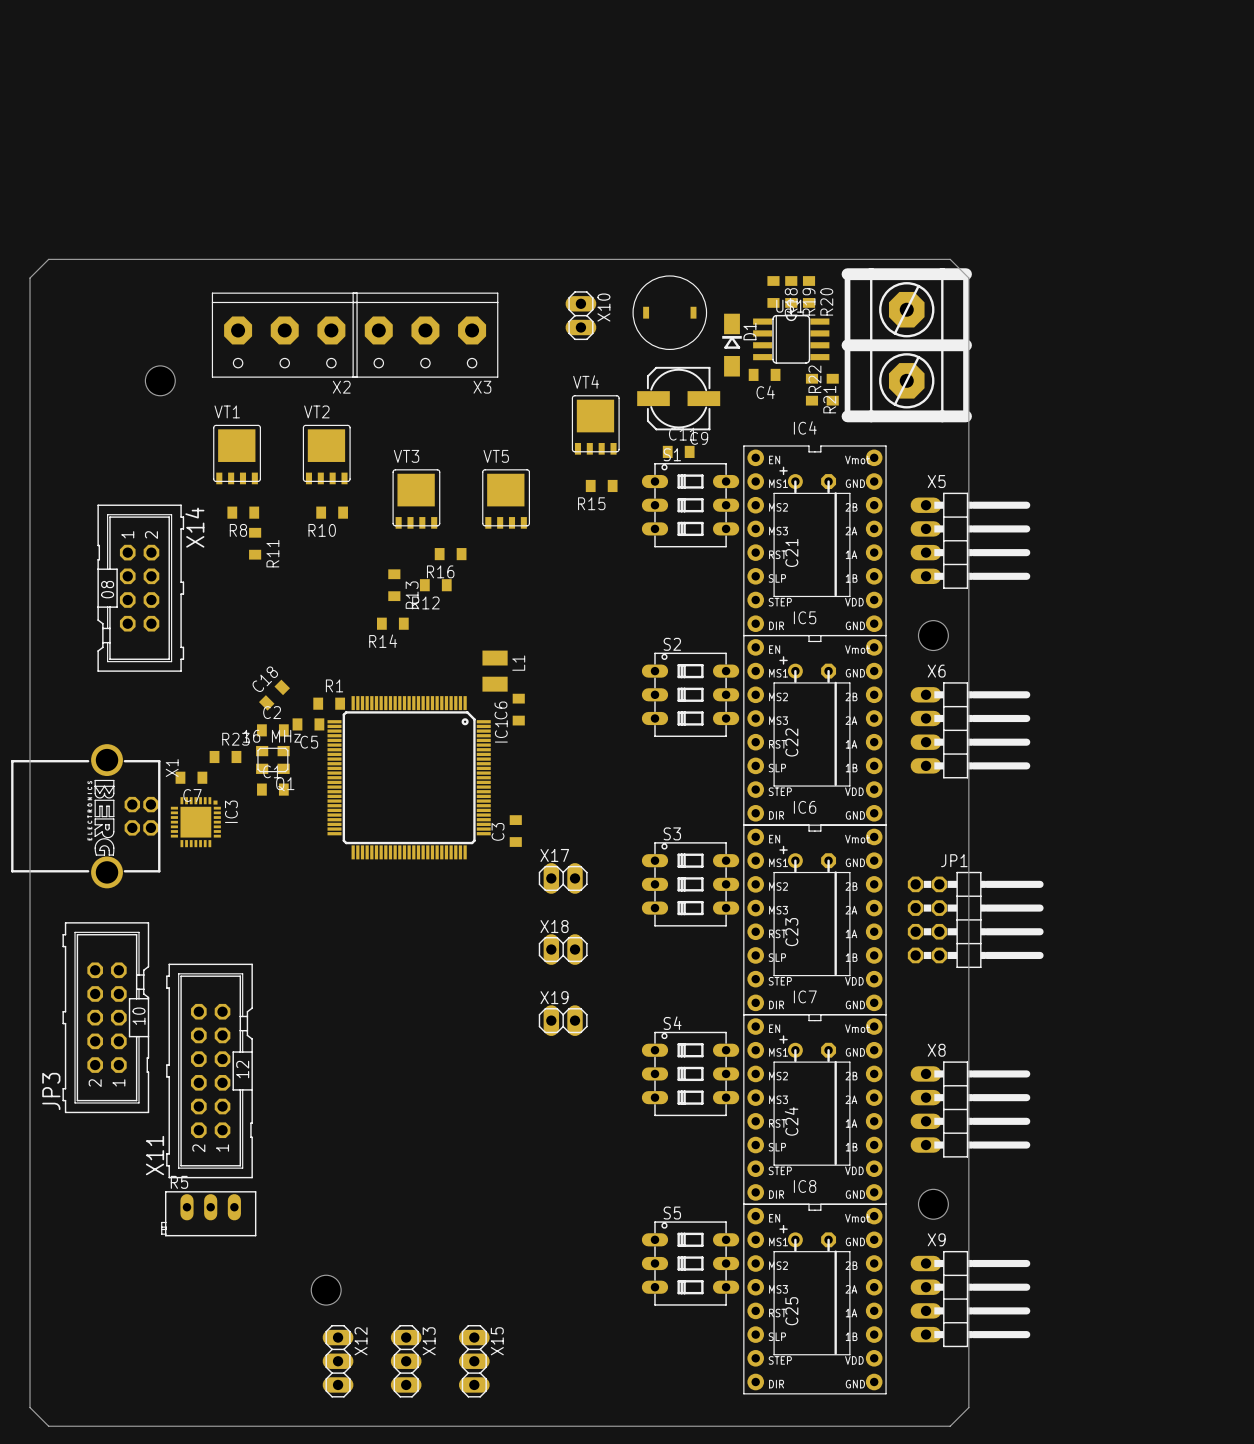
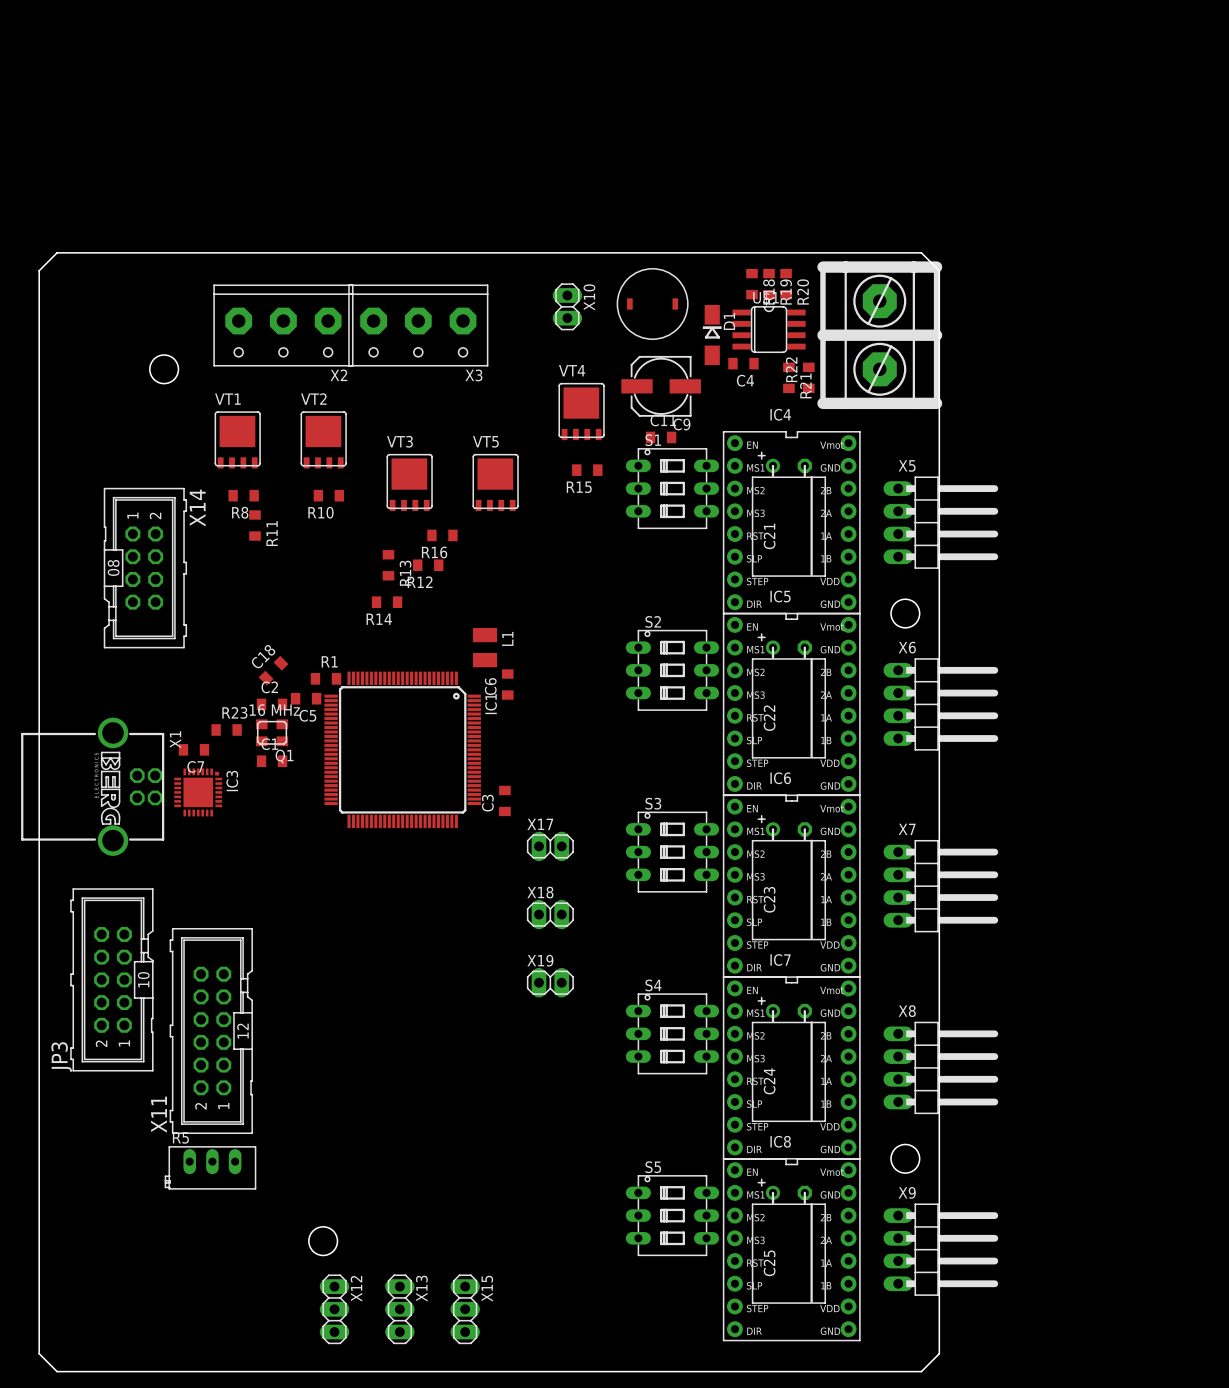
X7: none -> (940, 886)
JP1: (975, 919) -> none

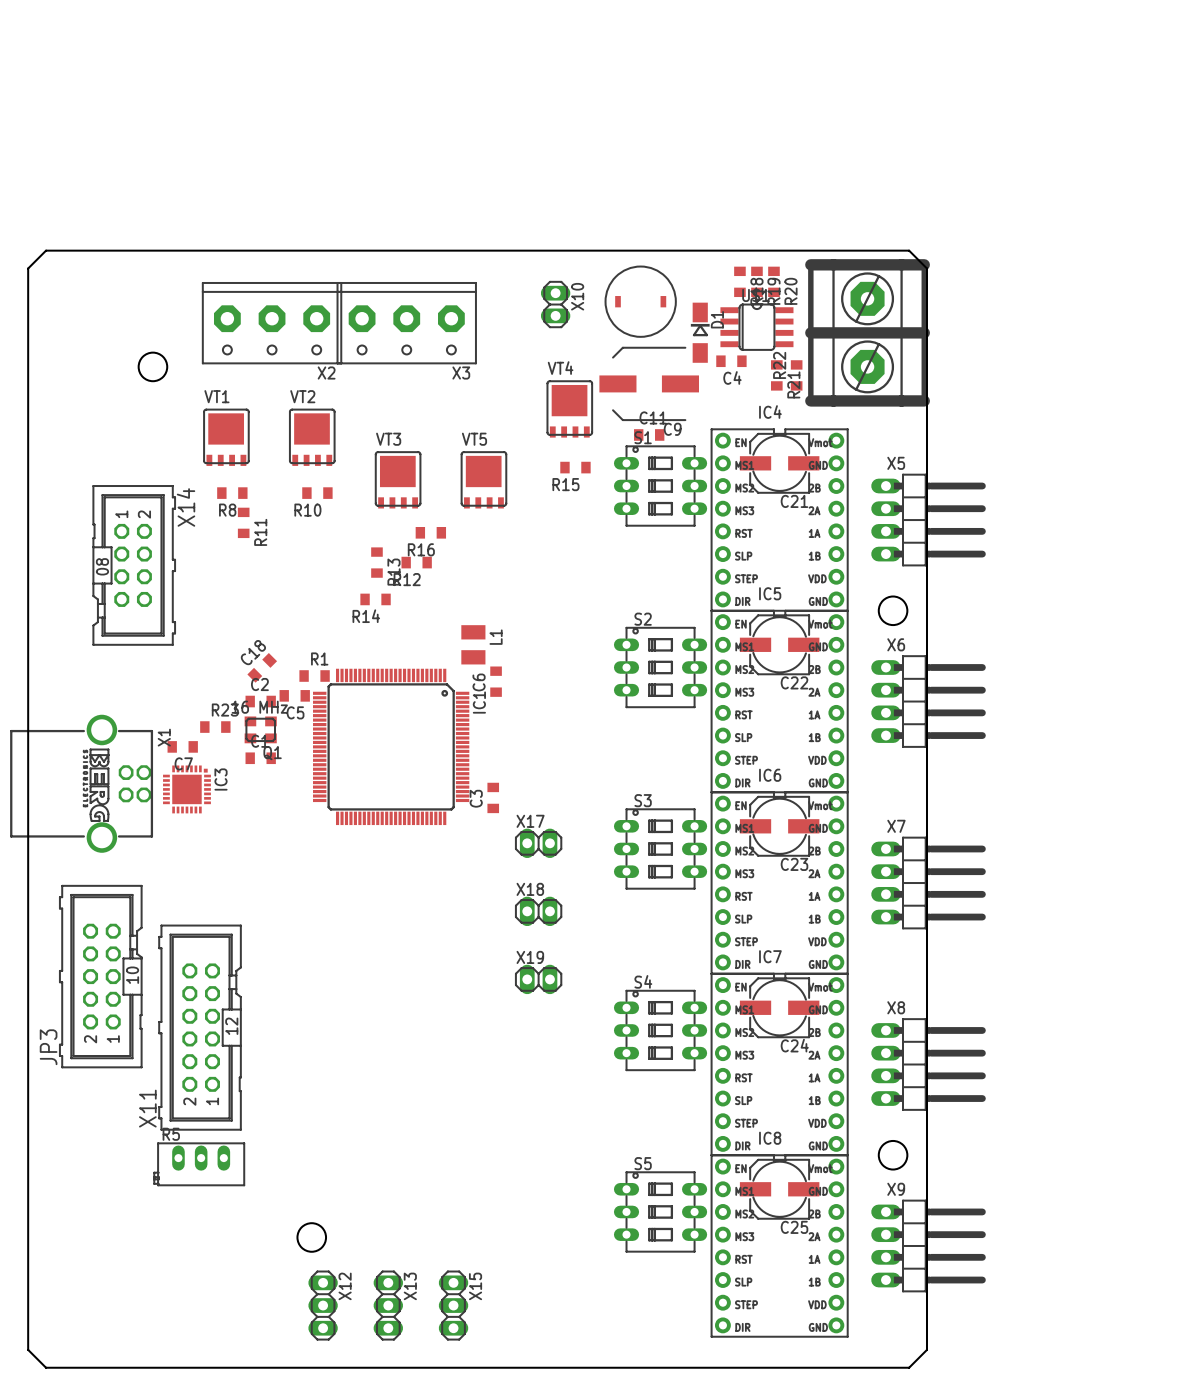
C9 footprint: [621, 355, 701, 417] -> [599, 346, 699, 422]
C21 footprint: [751, 451, 826, 577] -> [739, 432, 820, 494]
C21 name position: C21 (769, 536) -> C21 (794, 501)
C22 footprint: [751, 633, 826, 759] -> [739, 614, 820, 676]
C22 name position: C22 (769, 718) -> C22 (794, 682)
C23 footprint: [751, 815, 826, 941] -> [739, 795, 820, 857]
C23 name position: C23 (769, 899) -> C23 (794, 864)
C24 footprint: [751, 996, 826, 1122] -> [739, 977, 820, 1039]
C24 name position: C24 (769, 1081) -> C24 (794, 1045)
C25 footprint: [751, 1178, 826, 1304] -> [739, 1158, 820, 1220]
C25 name position: C25 (769, 1263) -> C25 (794, 1227)

